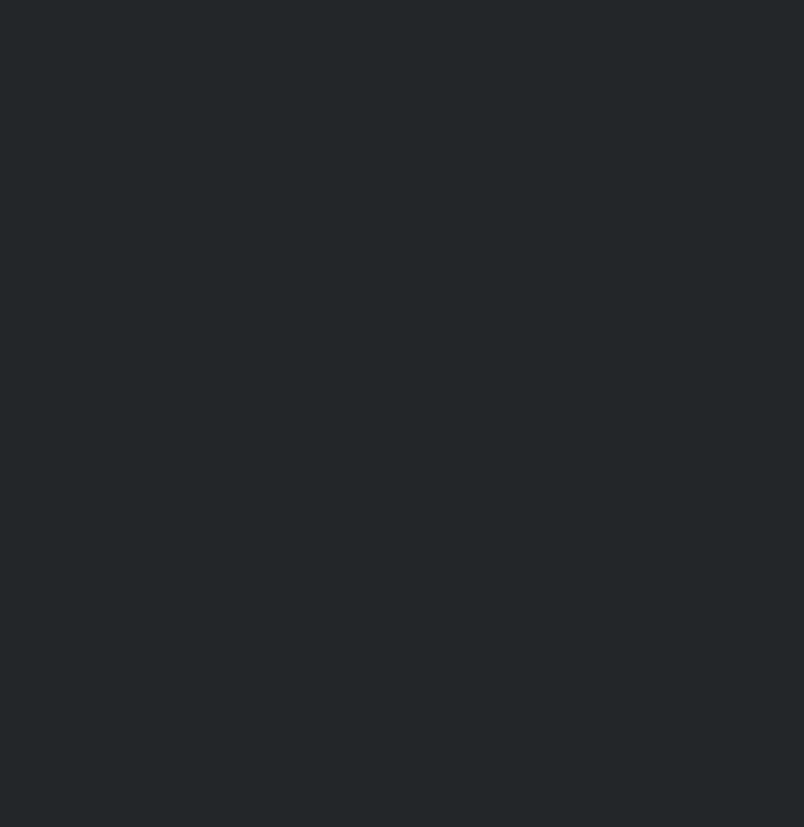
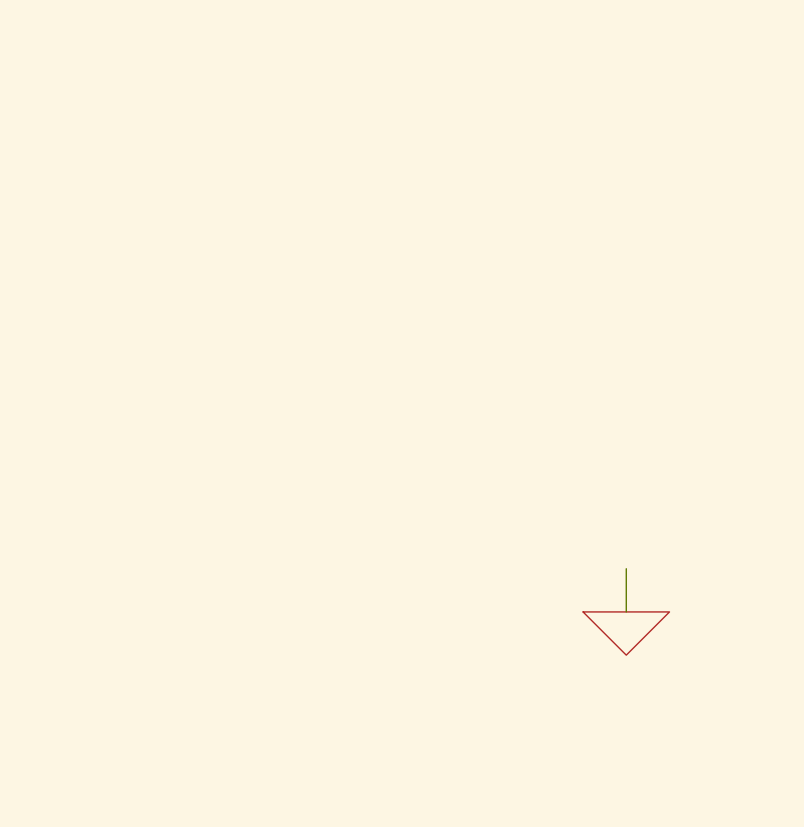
wire: none -> (626, 568) (626, 611)
power symbol: none -> (626, 633)

